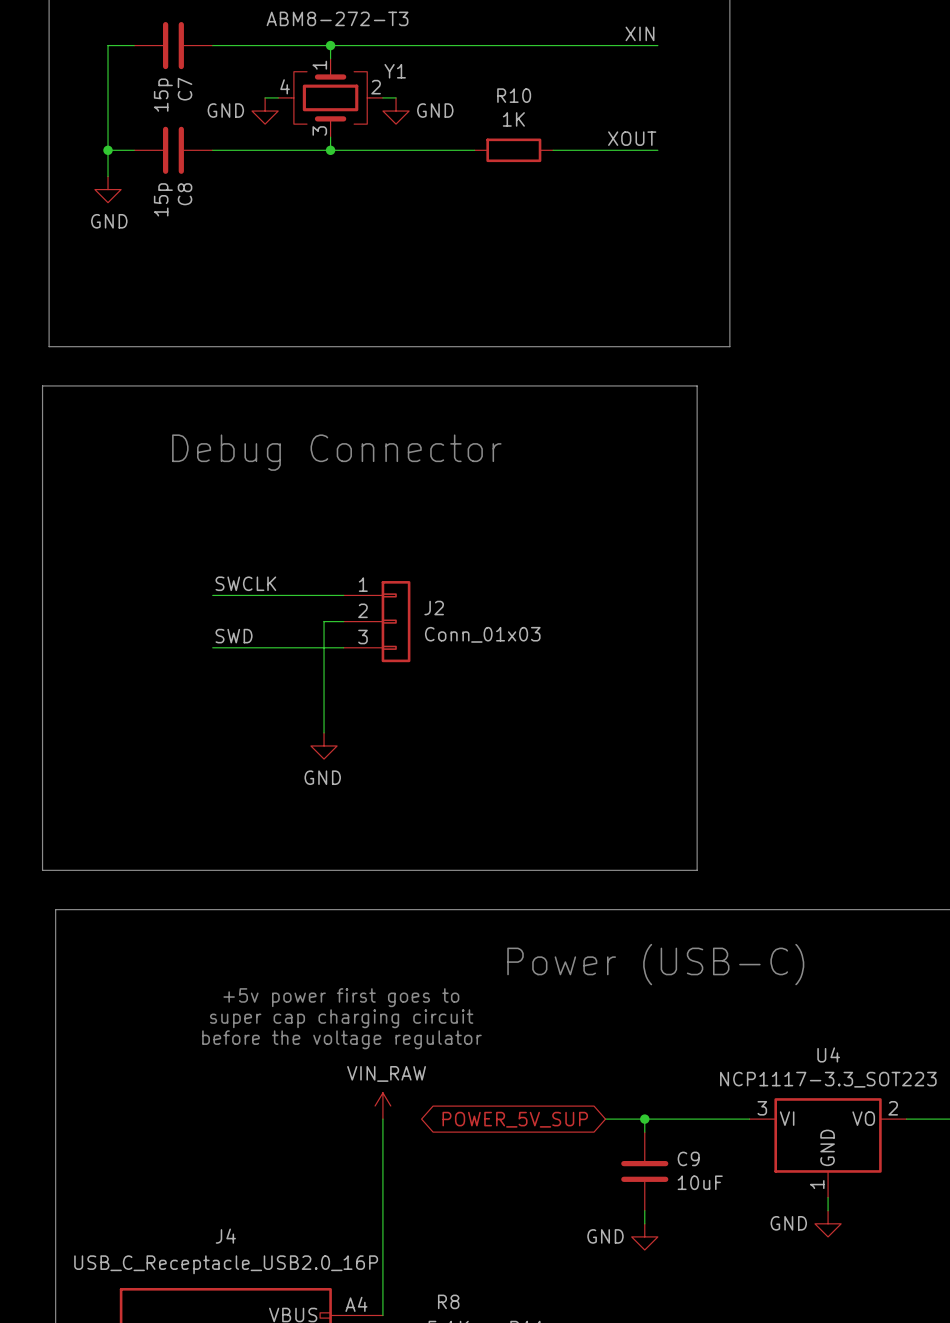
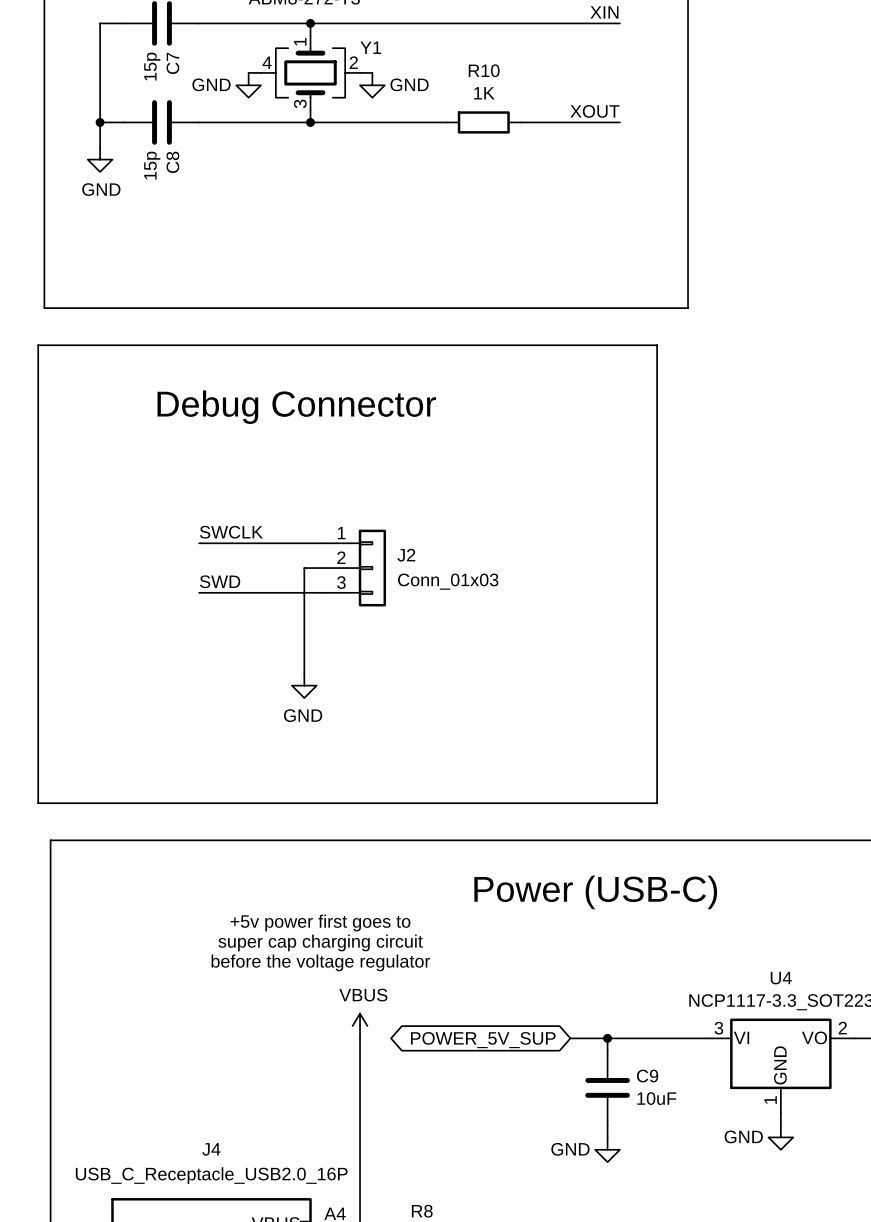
power symbol: VIN_RAW (382, 1106) -> VBUS (360, 1026)

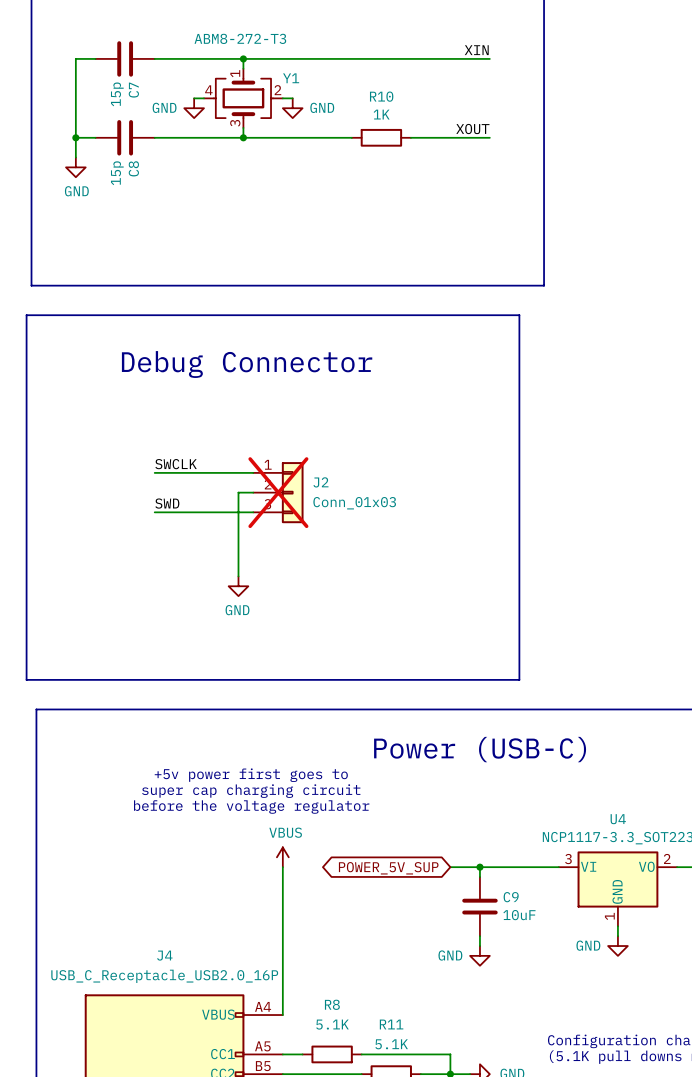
J2 do-not-place cross: none -> (278, 492)

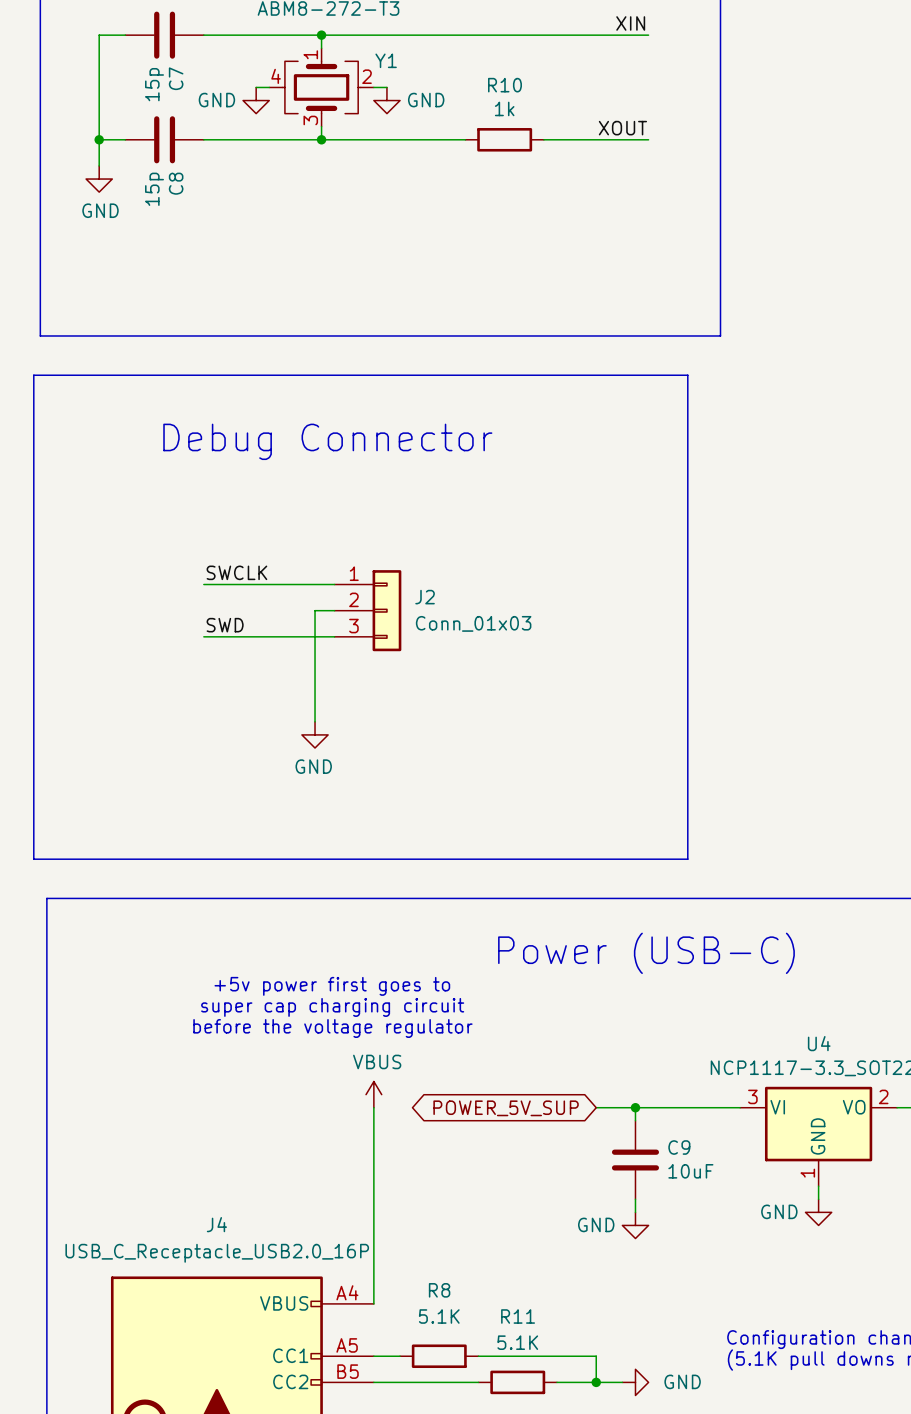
R10 value: 1K (381, 114) -> 1k (504, 108)
J2 do-not-place cross: (278, 492) -> none

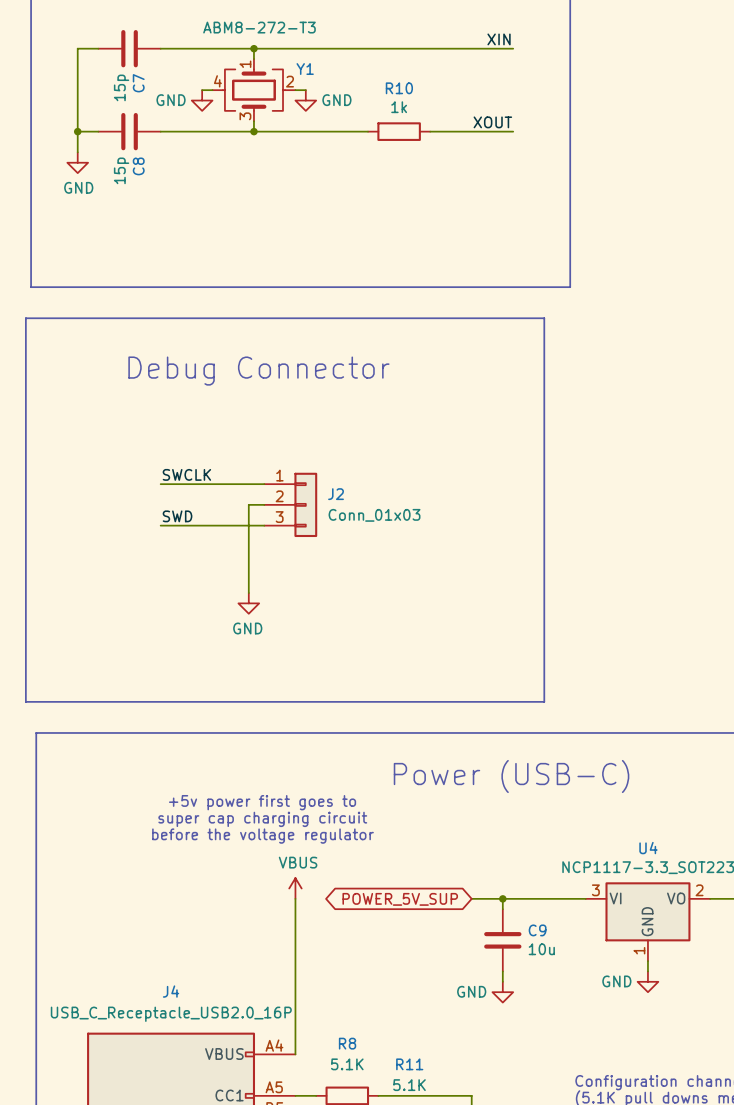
C9 value: 10uF (690, 1171) -> 10u (541, 949)

